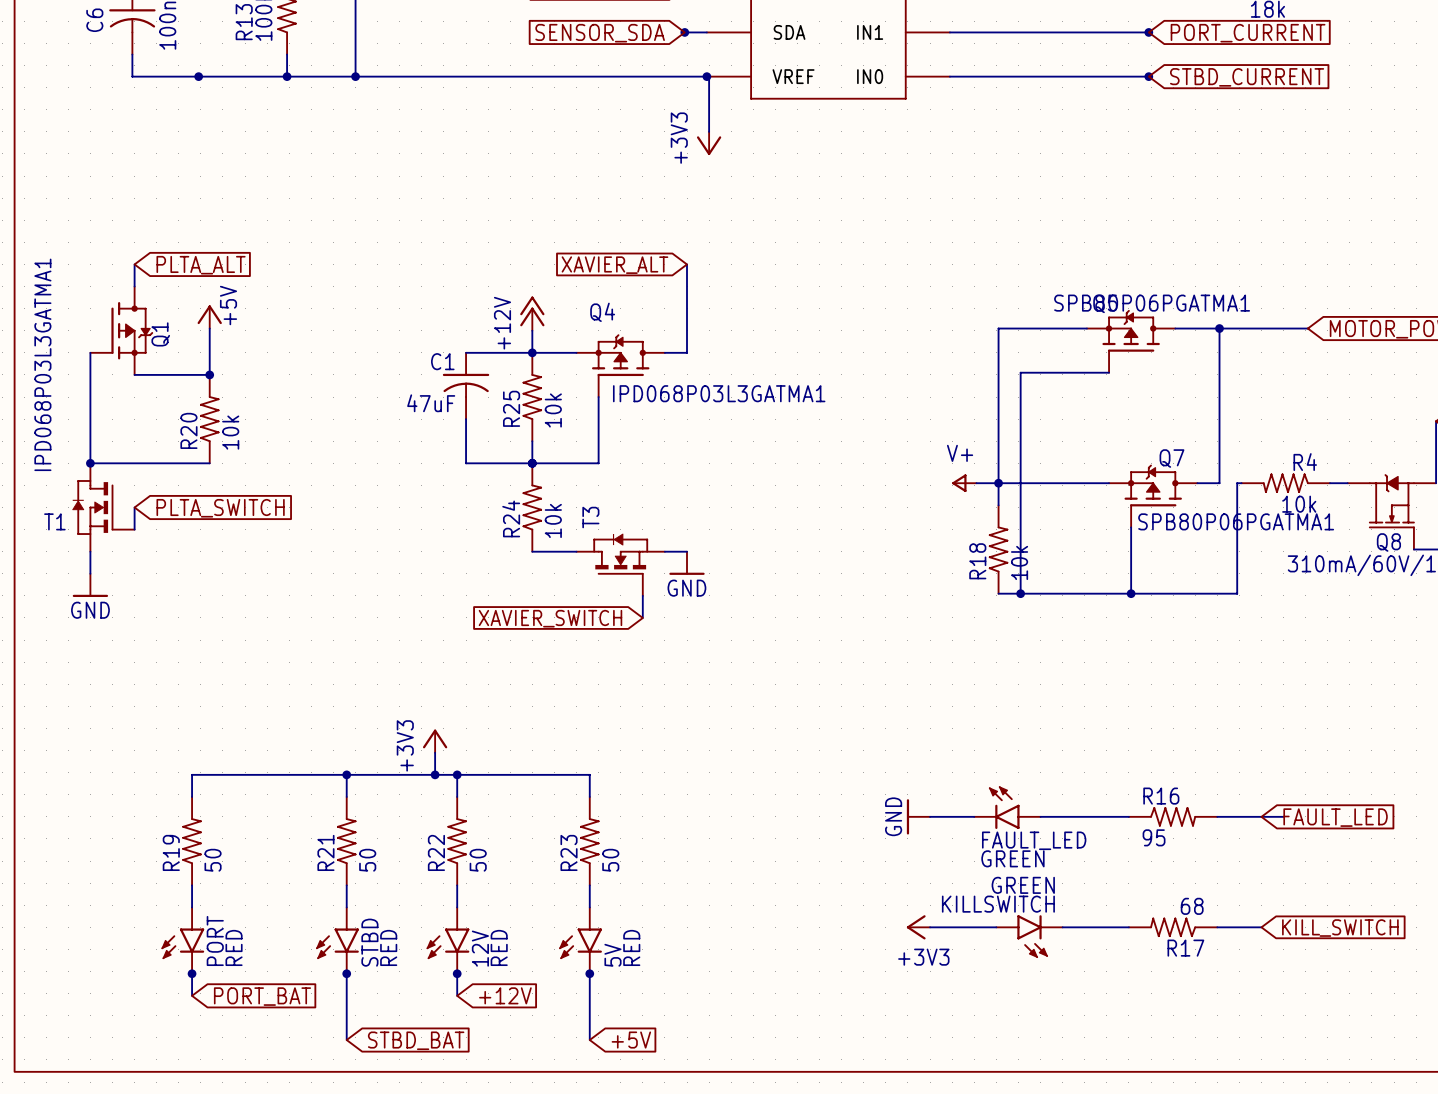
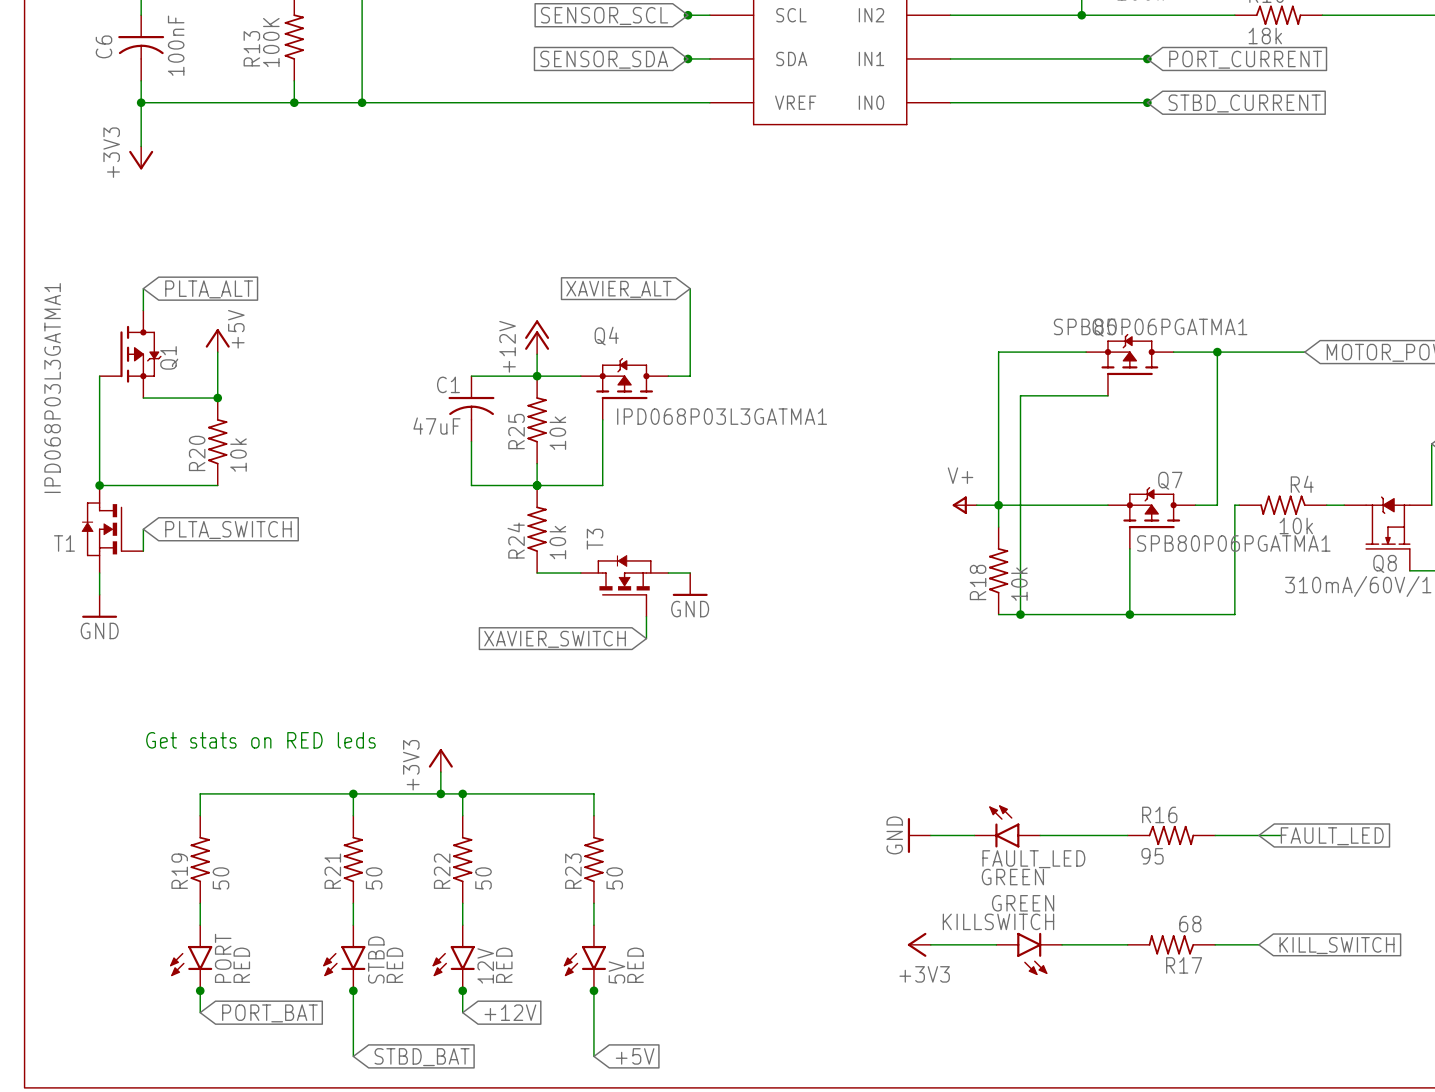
wire: none -> (141, 102) (141, 146)
junction: none -> (141, 102)
junction: (198, 76) -> none
wire: (706, 76) (709, 76) (709, 131) -> none
junction: (706, 76) -> none
power symbol: none -> +3V3 (141, 157)
power symbol: +3V3 (709, 143) -> none
text: none -> Get stats on RED leds (260, 740)

